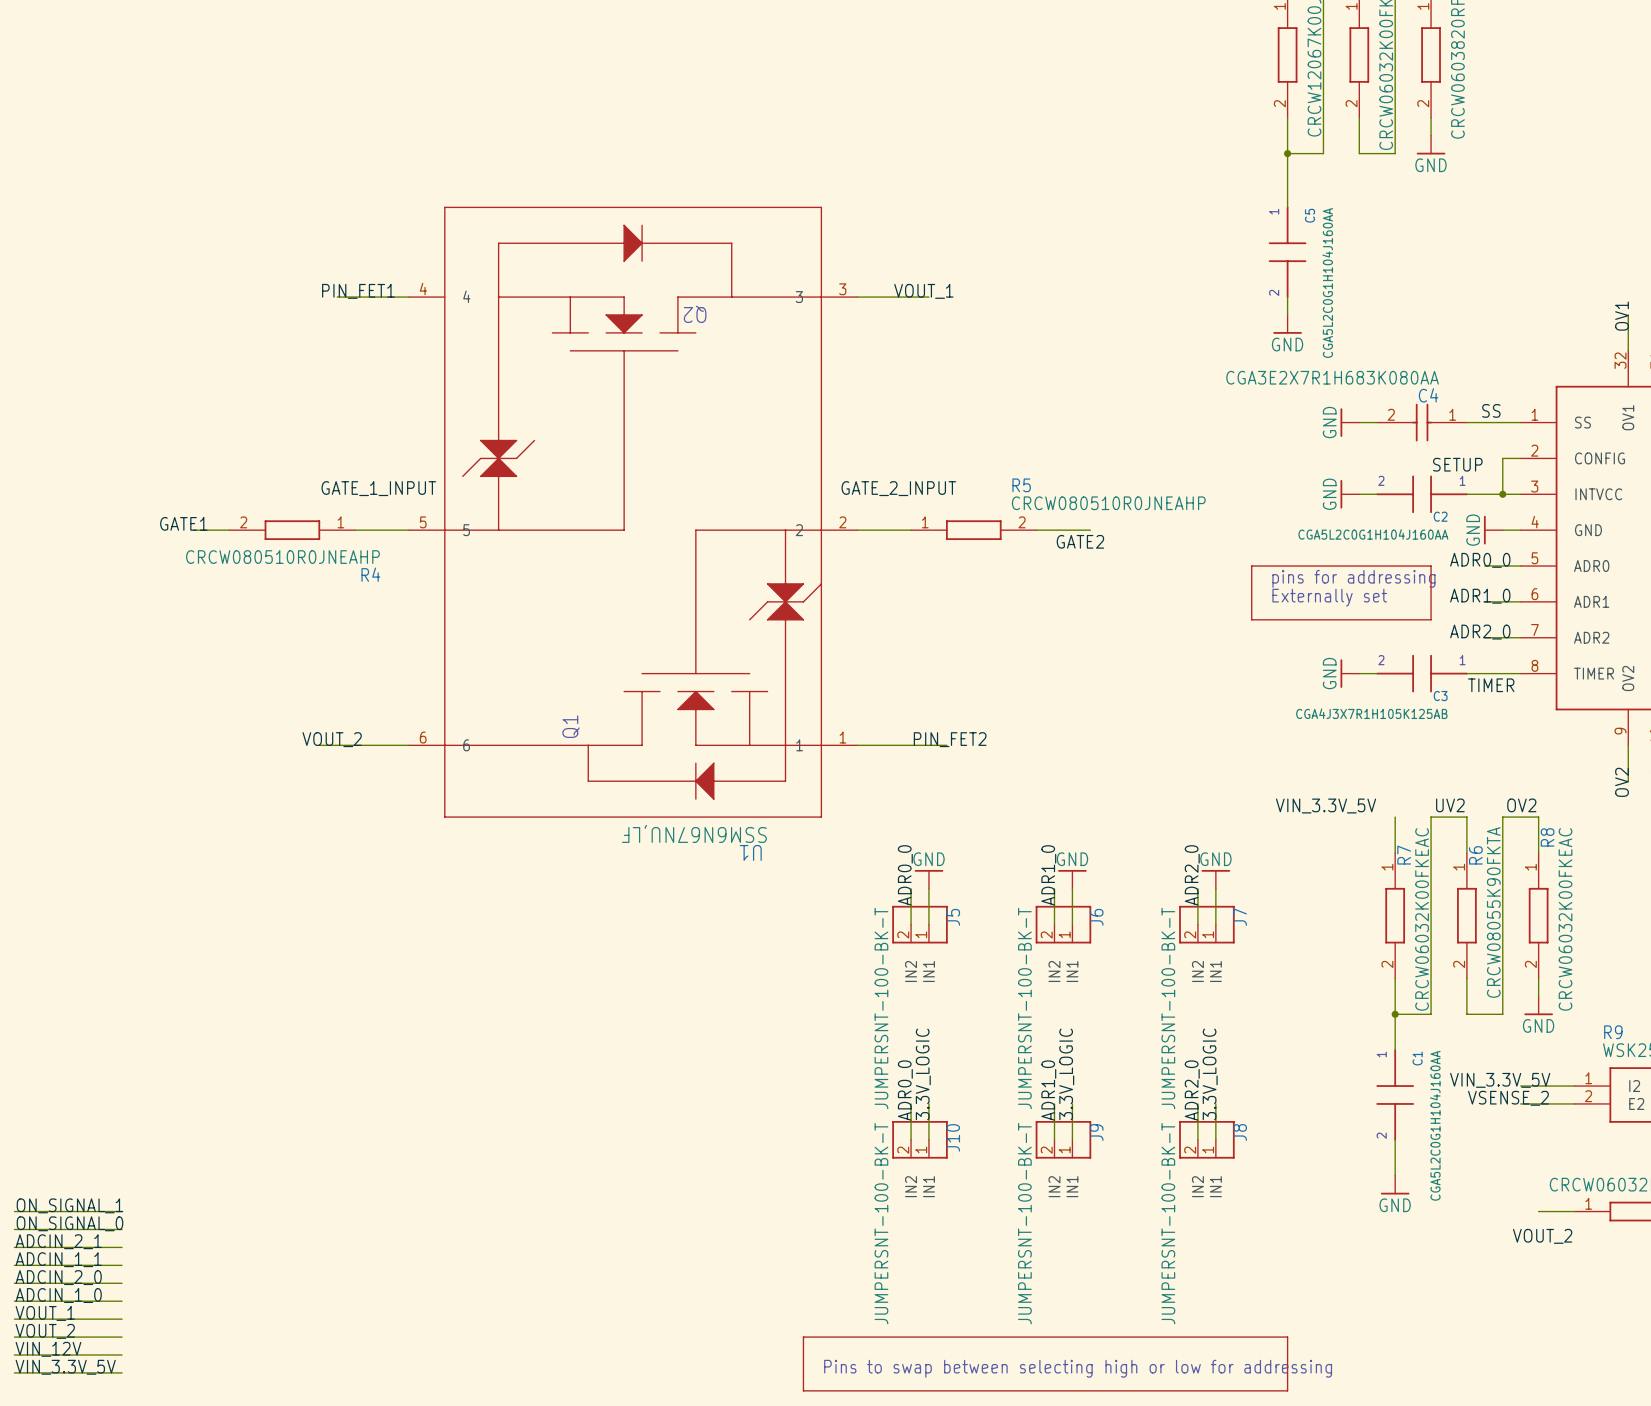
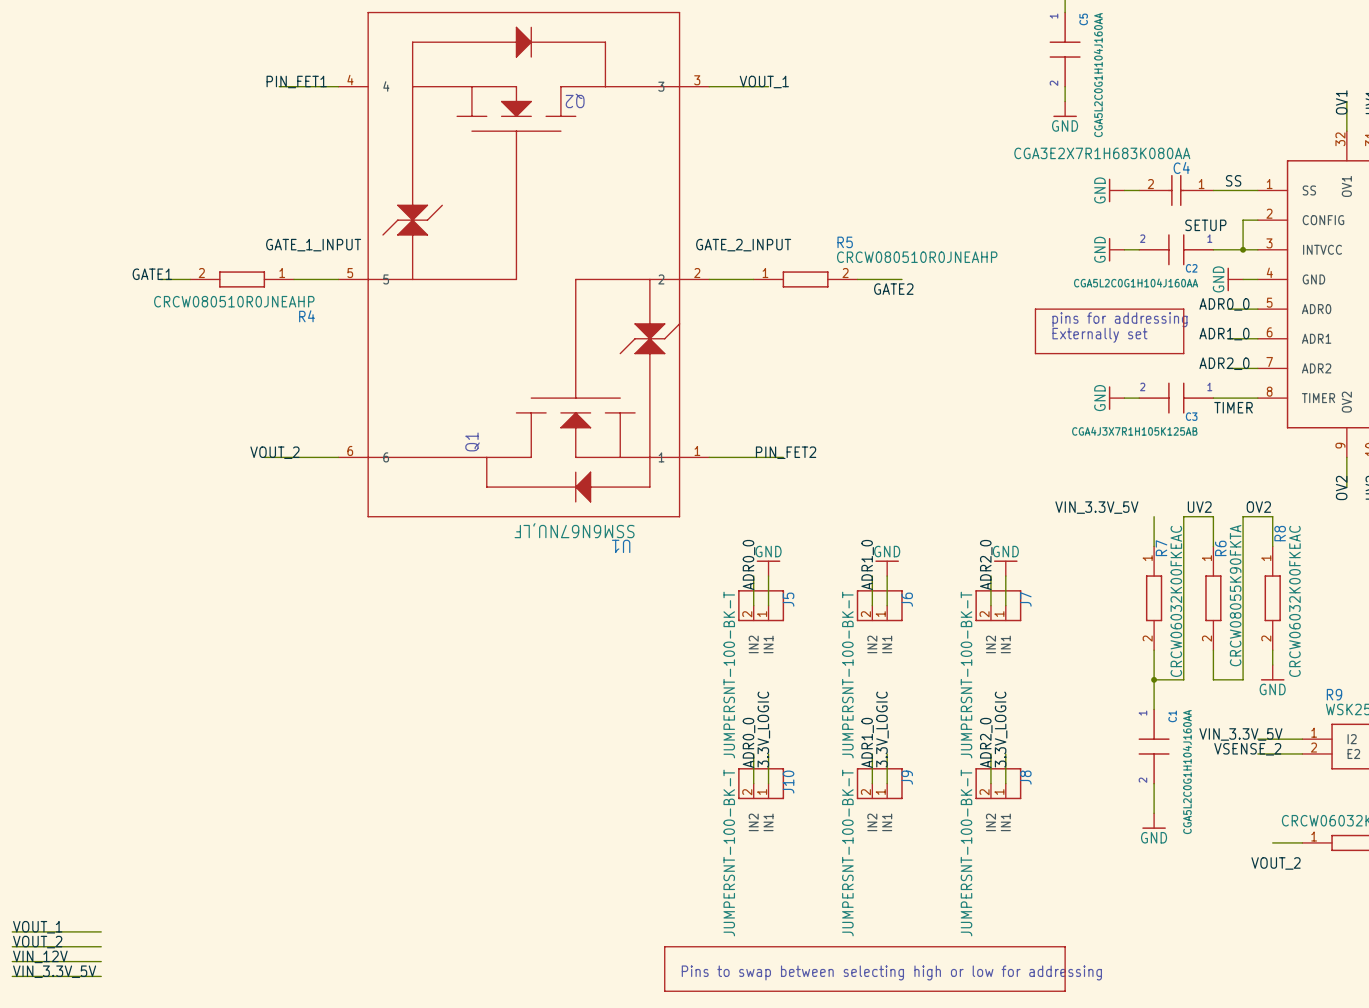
label: ON_SIGNAL_1 (69, 1205) -> none
wire: (14, 1211) (122, 1211) -> none
label: ON_SIGNAL_0 (69, 1223) -> none
wire: (14, 1229) (122, 1229) -> none
label: ADCIN_2_1 (58, 1241) -> none
wire: (14, 1247) (122, 1247) -> none
label: ADCIN_1_1 (58, 1259) -> none
wire: (14, 1265) (122, 1265) -> none
label: ADCIN_2_0 (58, 1277) -> none
wire: (14, 1283) (122, 1283) -> none
label: ADCIN_1_0 (58, 1295) -> none
wire: (14, 1301) (122, 1301) -> none

